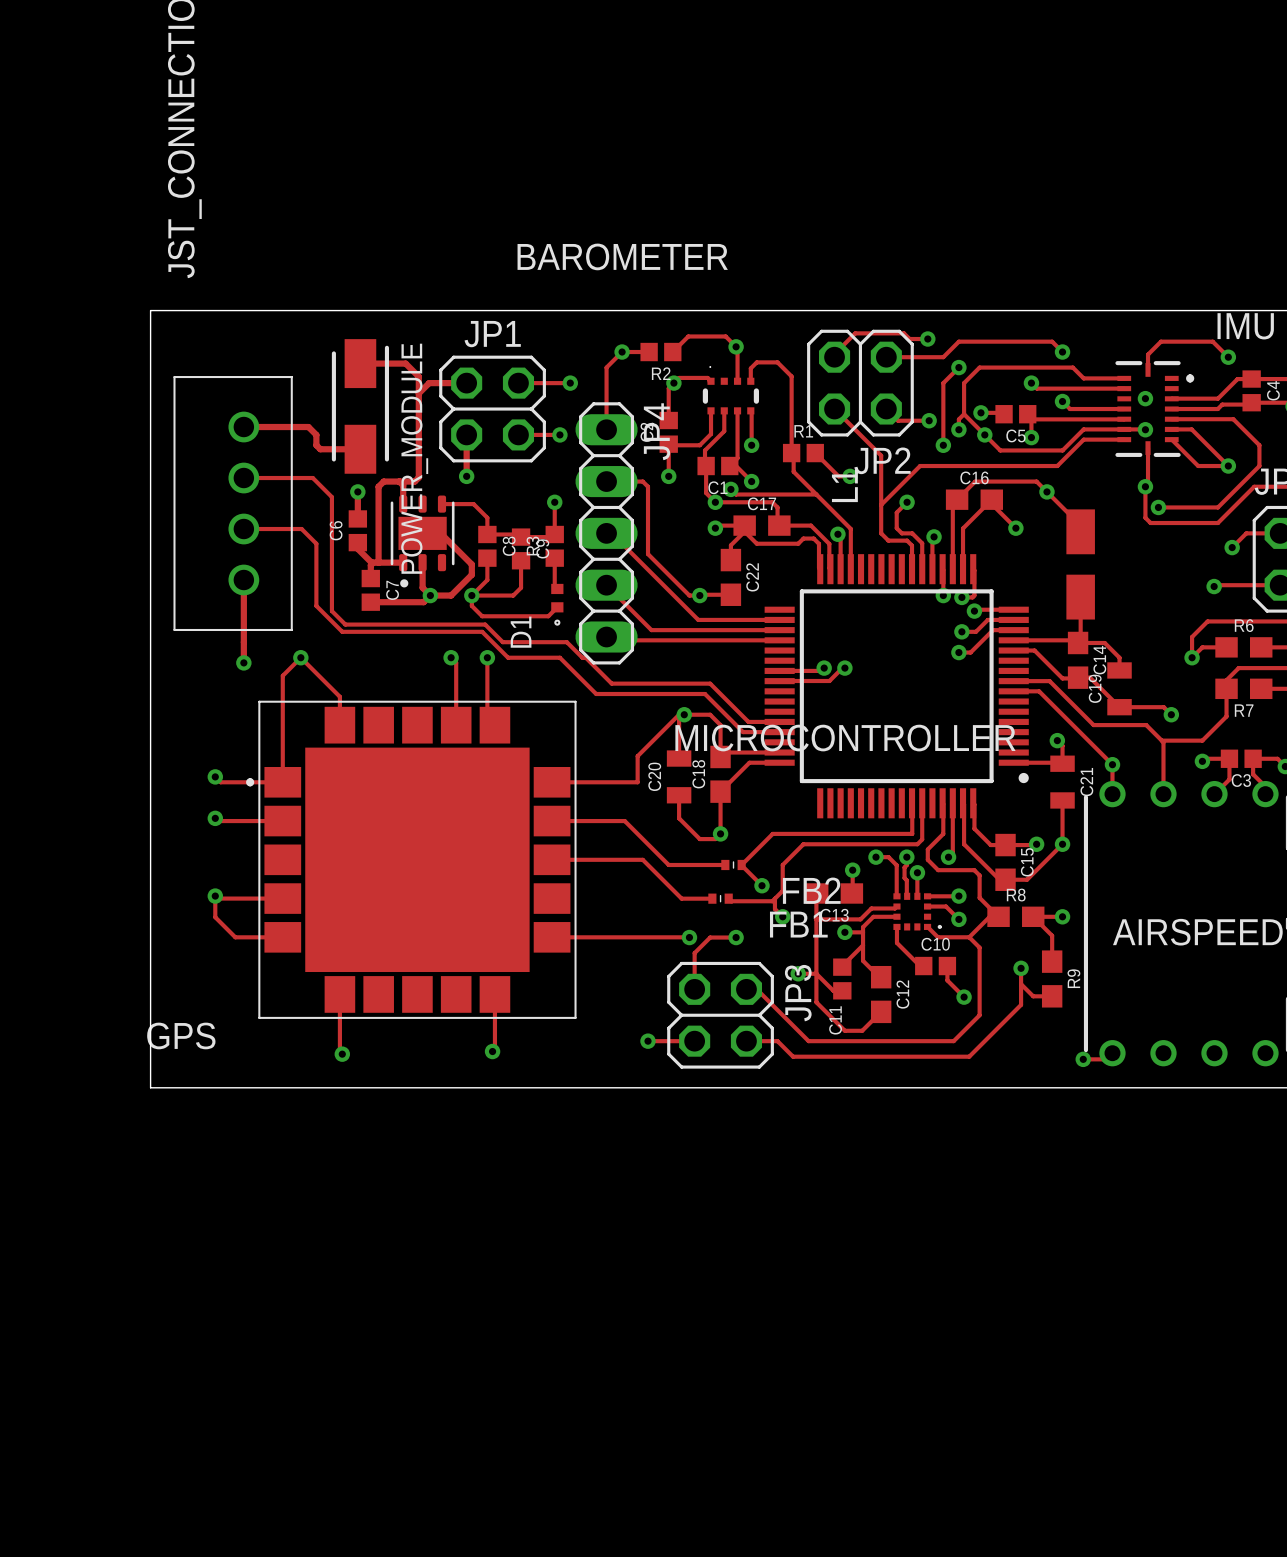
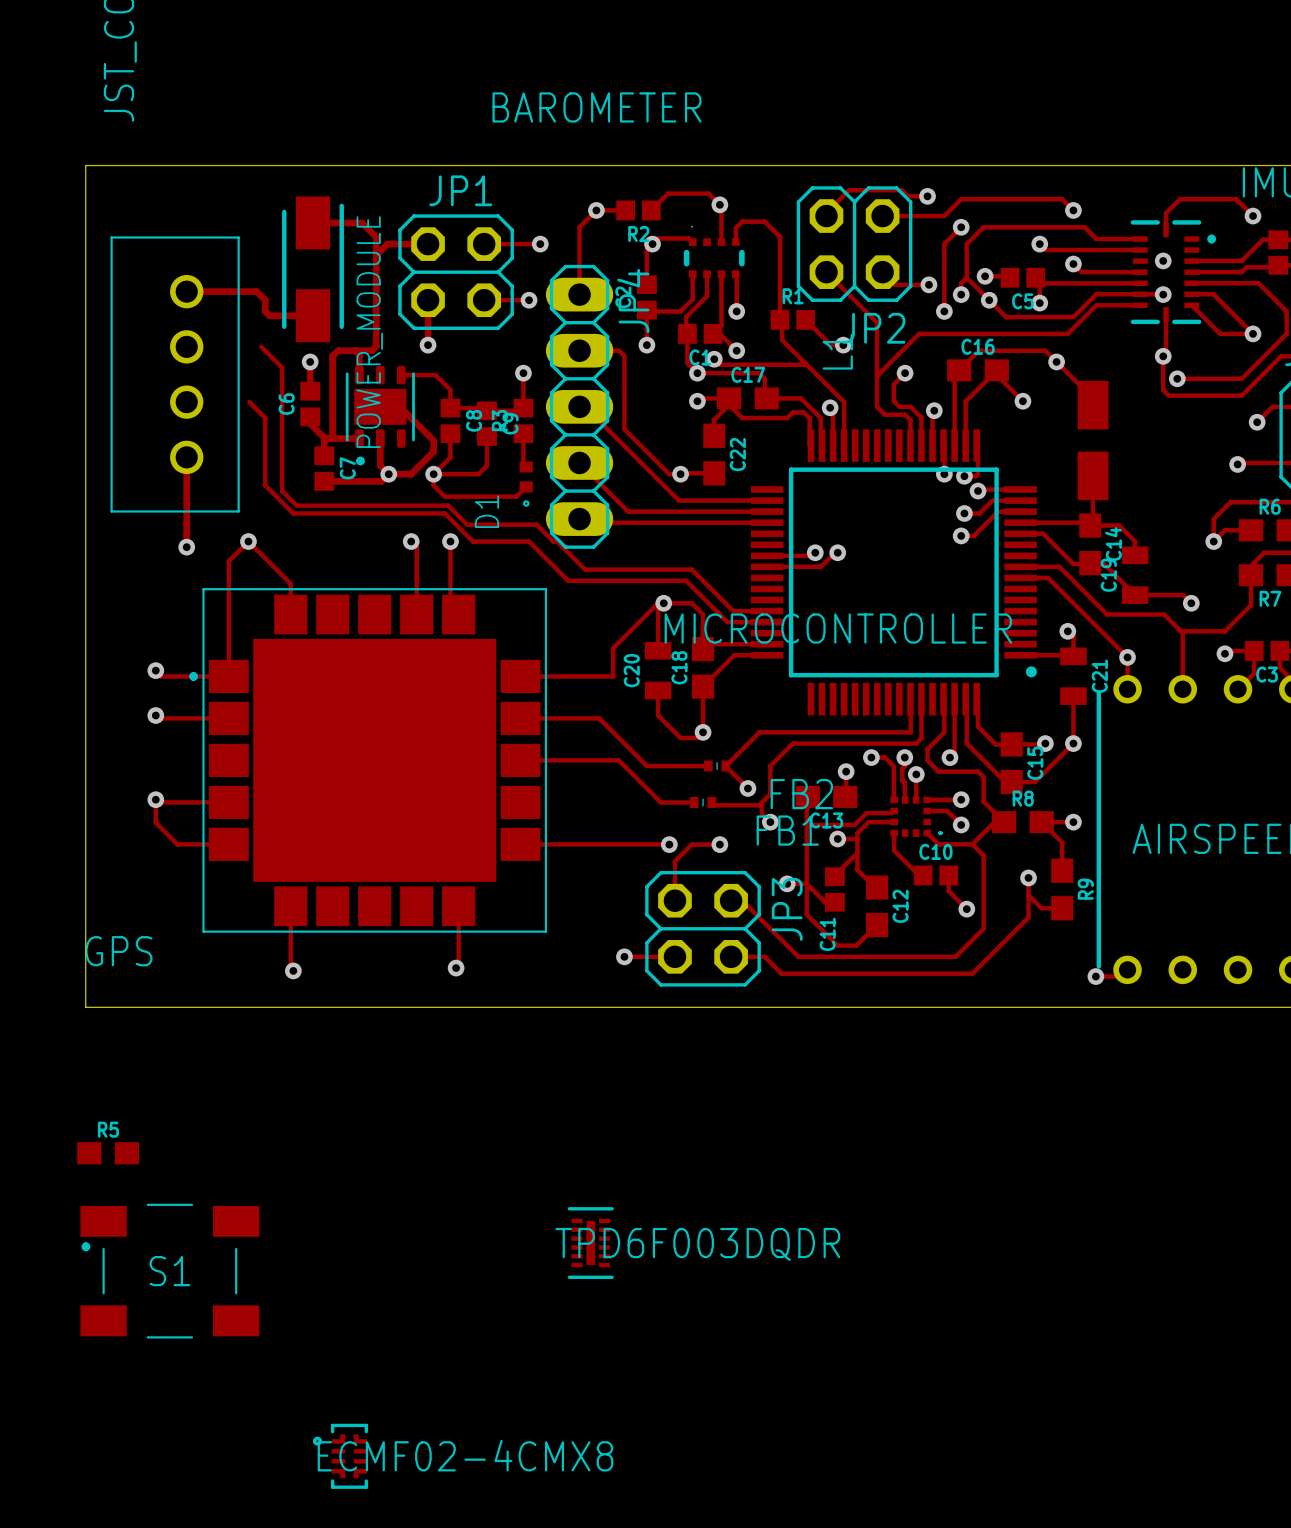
track: (243, 478) (312, 478) -> none
track: (243, 529) (301, 529) -> none
R5: none -> (108, 1153)
part: none -> TPD6F003DQDR (590, 1243)
S1: none -> (169, 1271)
part: none -> ECMF02-4CMX8 (340, 1456)

